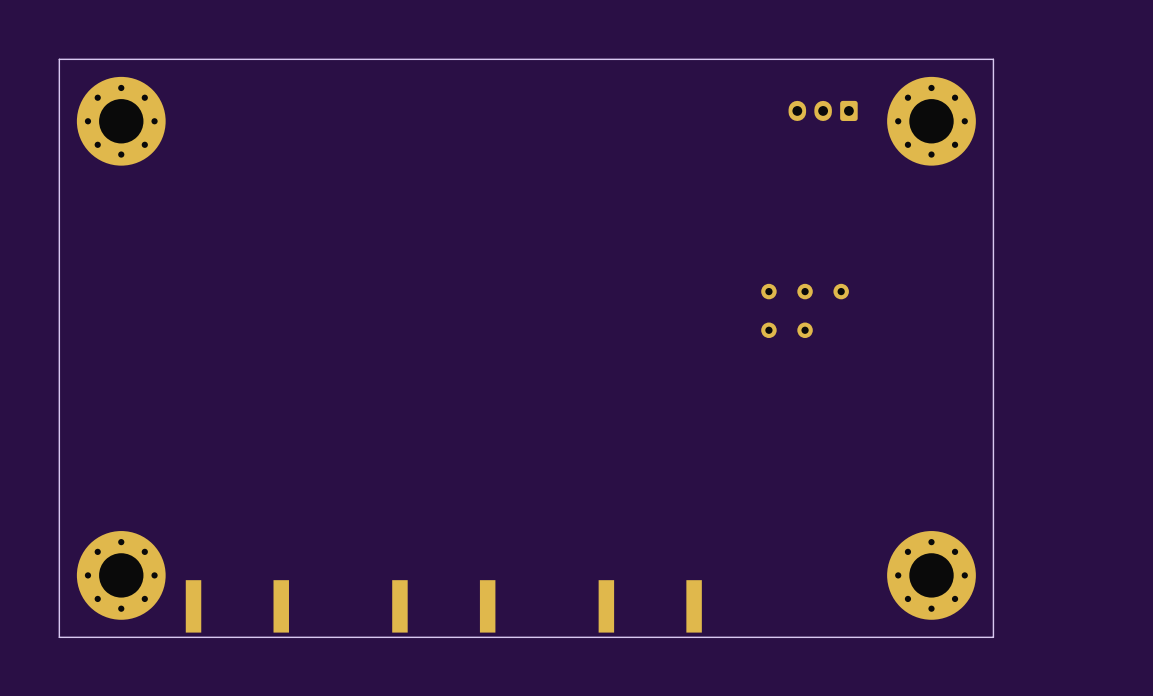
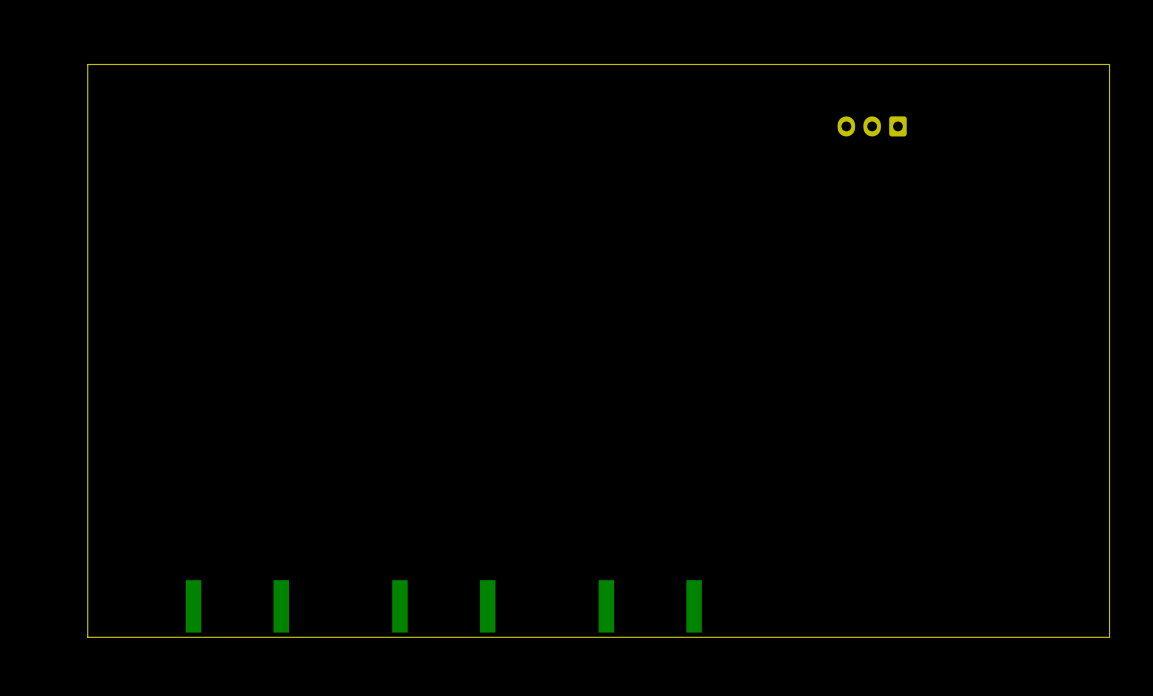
part position: (823, 110) -> (872, 126)
part: (121, 121) -> none
part: (931, 121) -> none
part: (768, 291) -> none
part: (805, 291) -> none
part: (841, 291) -> none
part: (768, 330) -> none
part: (805, 330) -> none
part: (121, 575) -> none
part: (931, 575) -> none
board edge: (993, 637) (993, 59) (59, 59) (59, 637) (87, 637) -> (993, 637) (1109, 637) (1109, 64) (87, 64) (87, 637)

